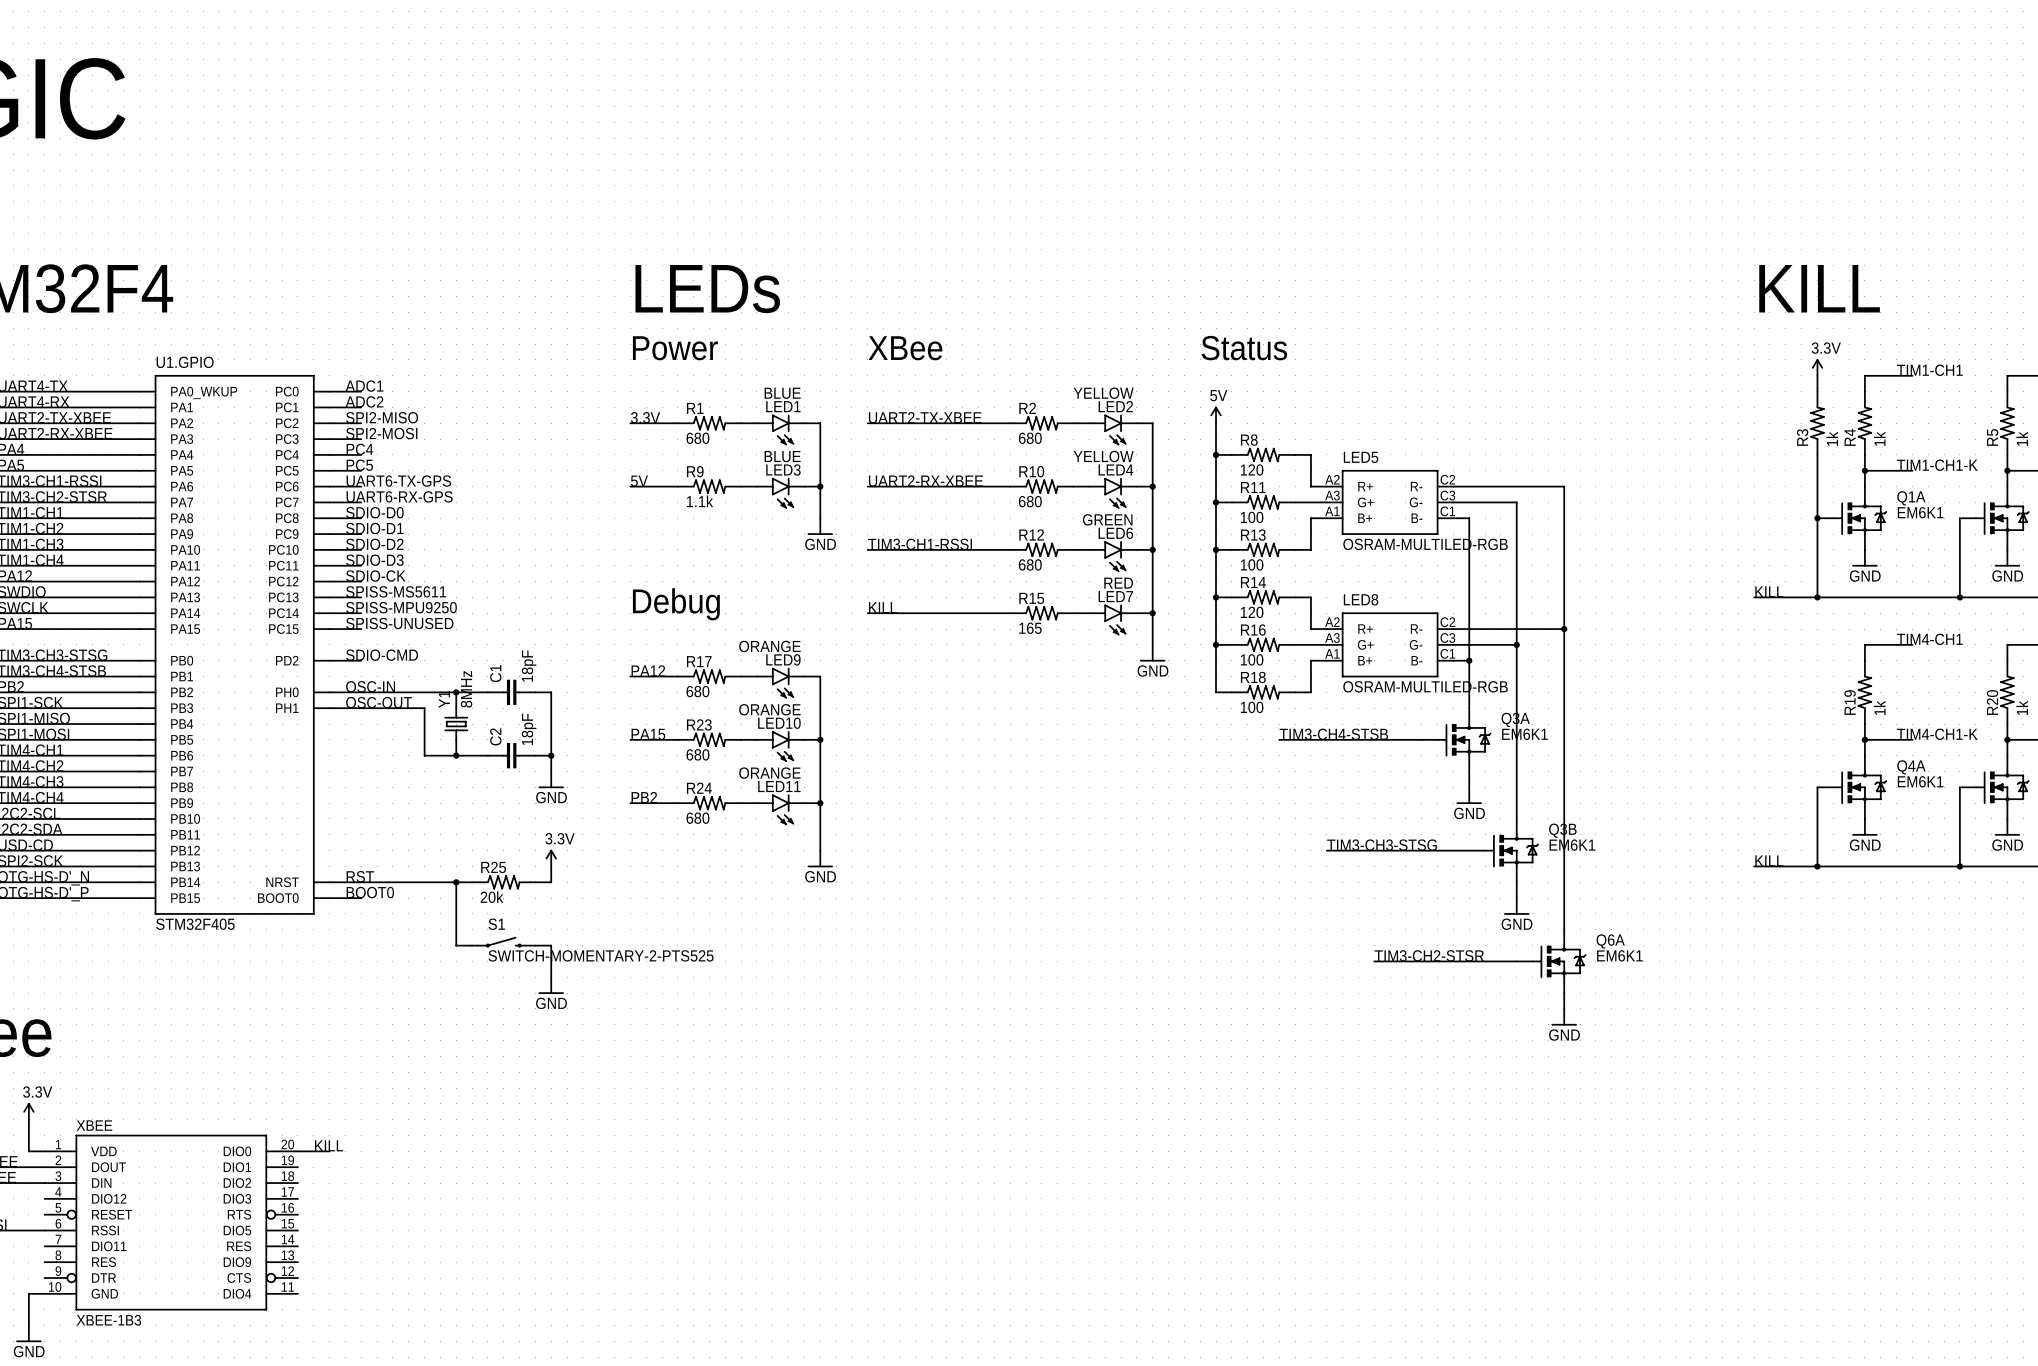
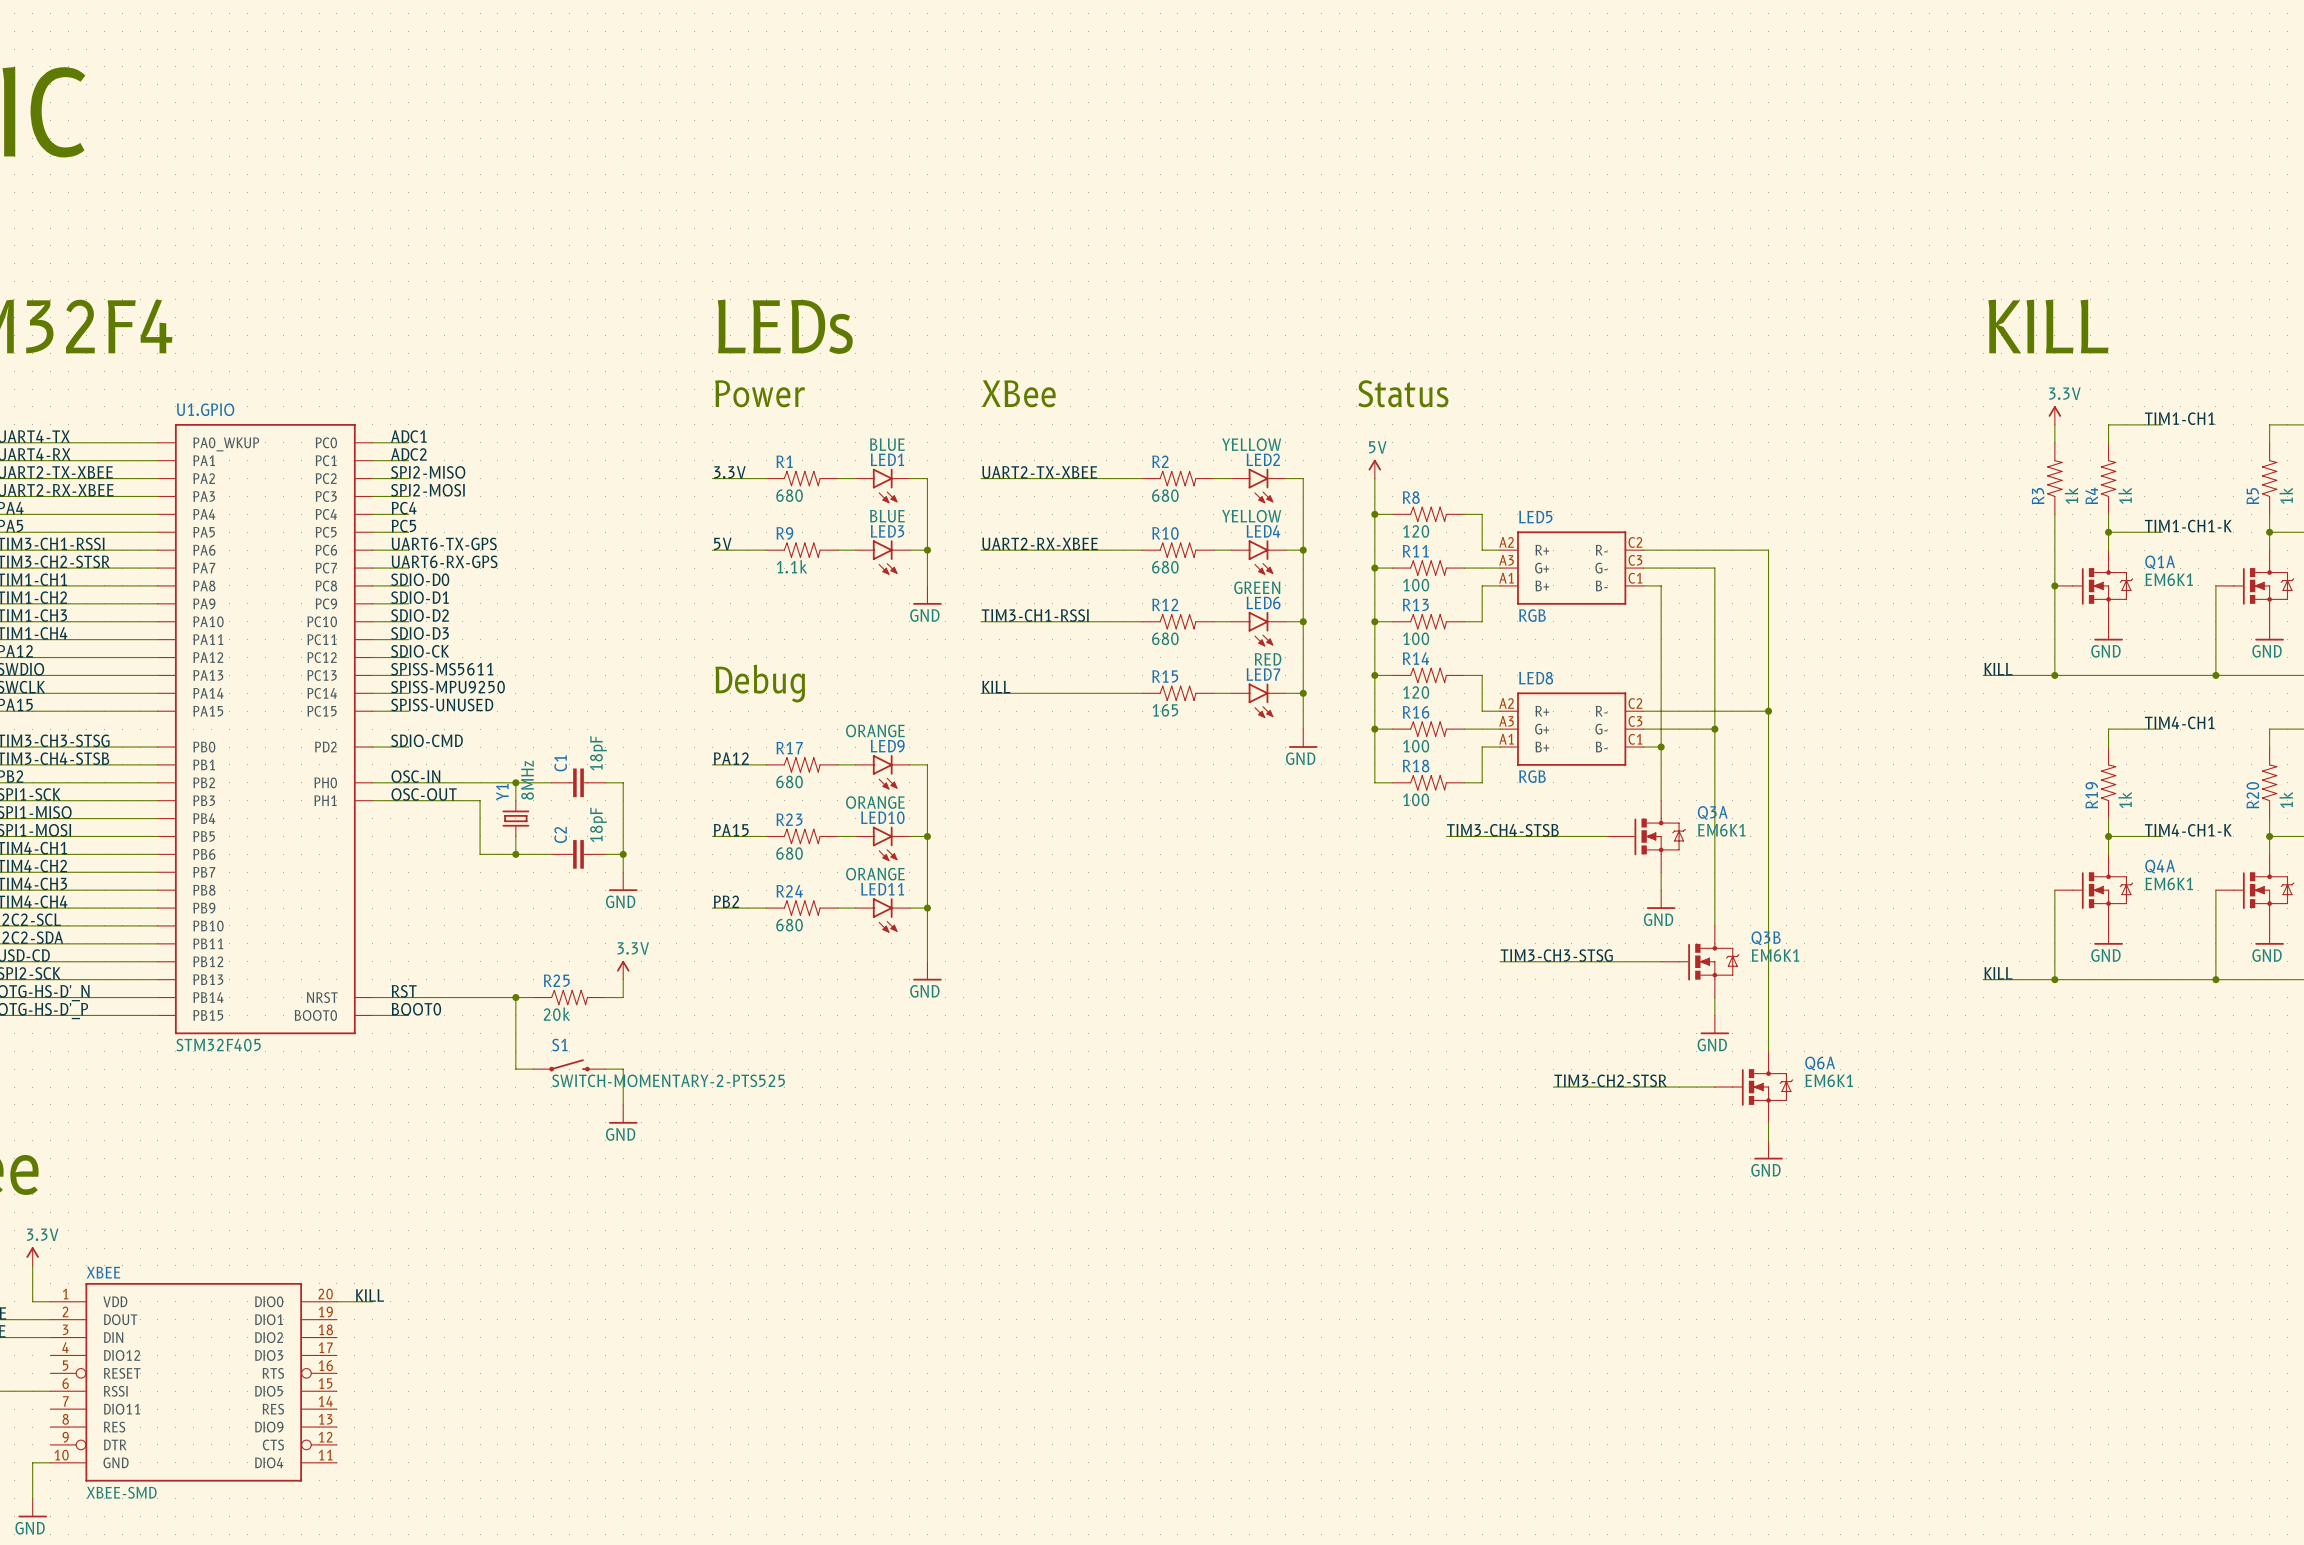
LED5 value: OSRAM-MULTILED-RGB (1425, 544) -> RGB (1532, 615)
LED8 value: OSRAM-MULTILED-RGB (1425, 686) -> RGB (1532, 776)
XBEE value: XBEE-1B3 (108, 1320) -> XBEE-SMD (121, 1492)

